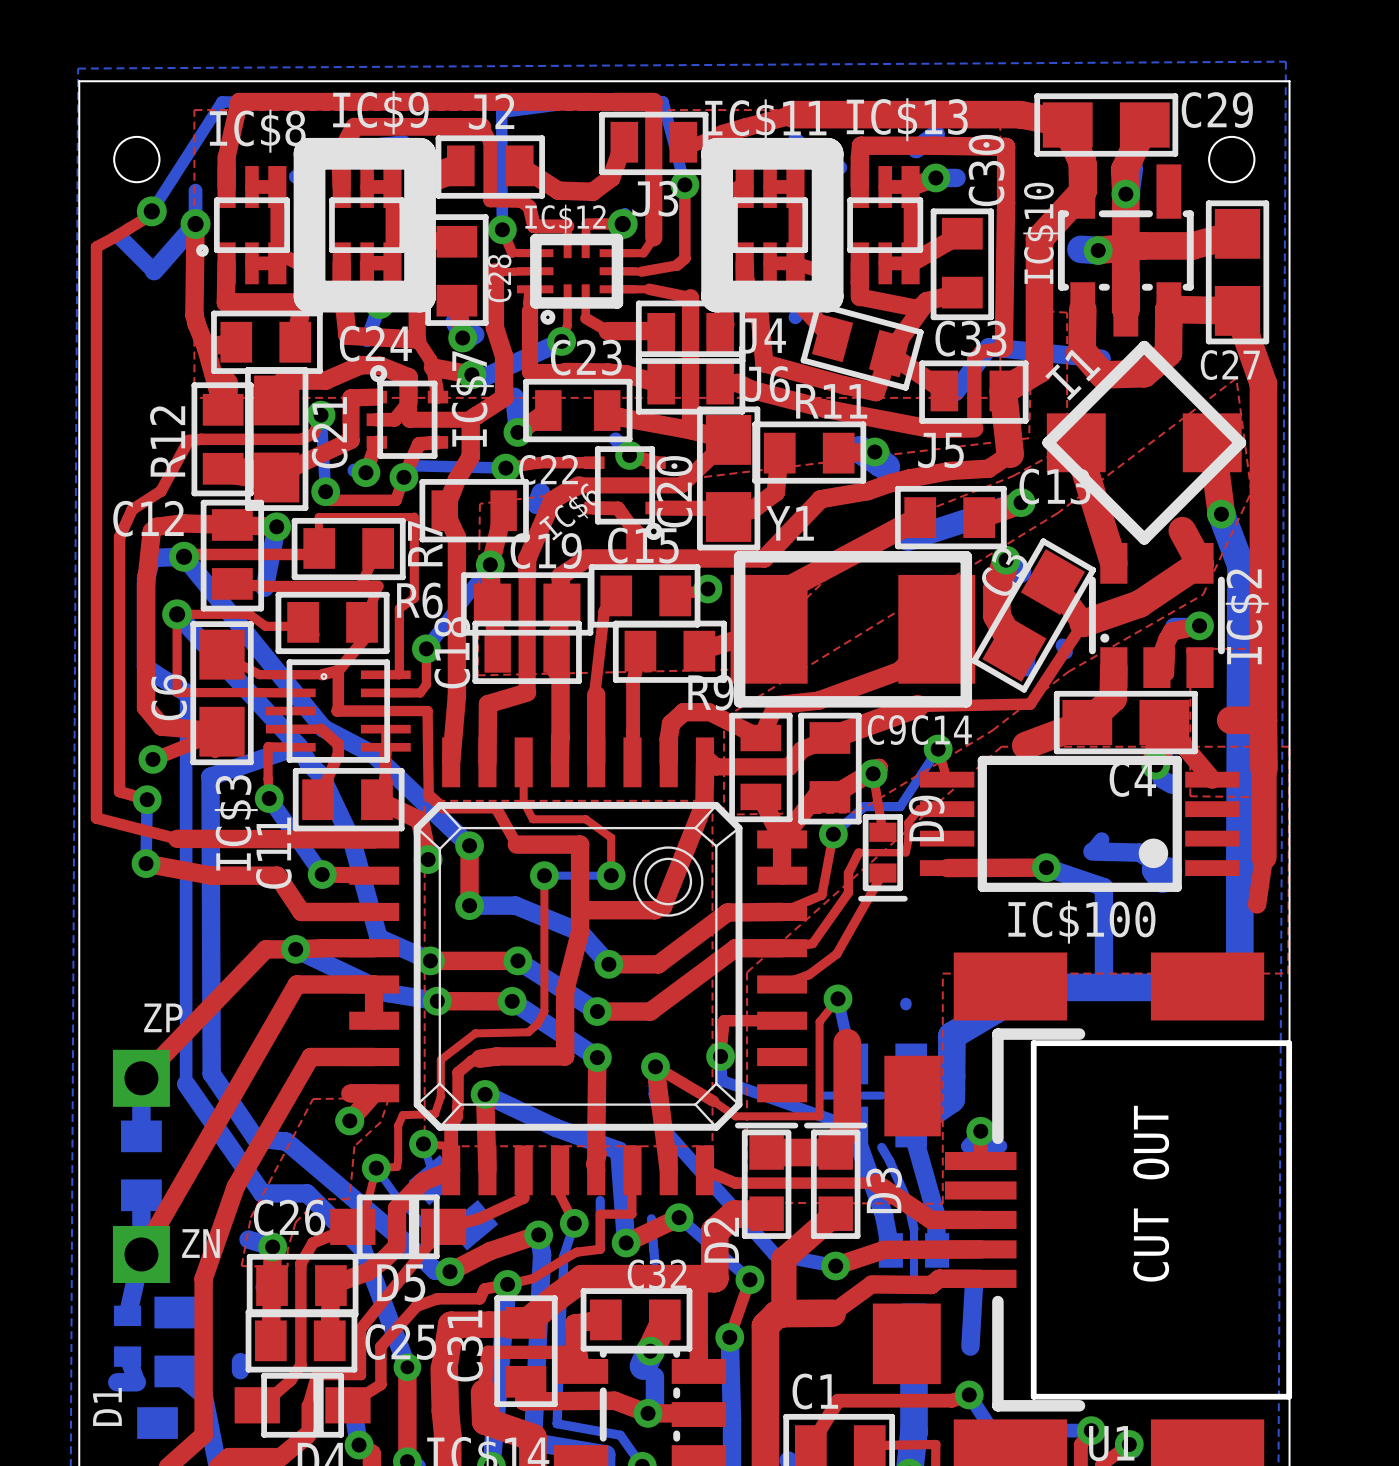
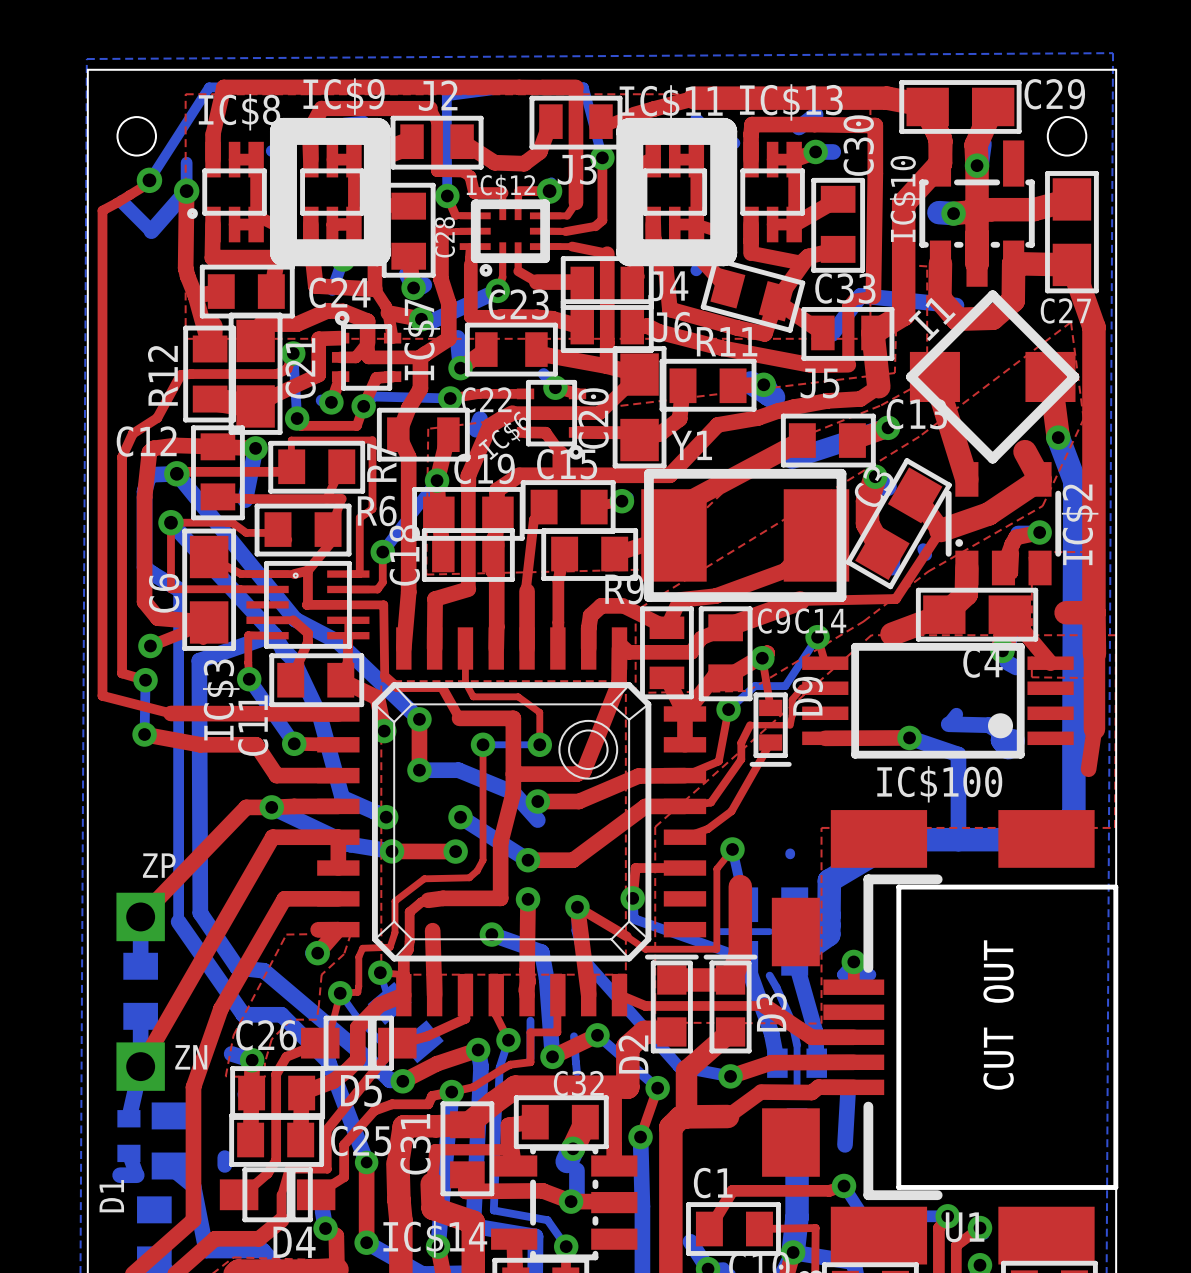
top track: (727, 912) (658, 964) (608, 964) -> (638, 776) (578, 801) (537, 801)
top track: (430, 960) (517, 960) -> none
via position: (608, 964) -> (537, 801)
bottom track: (512, 1001) (597, 1057) -> none
bottom track: (485, 1094) (555, 1127) (619, 1150) -> (491, 934) (541, 952) (546, 978)
via position: (485, 1094) -> (491, 934)

